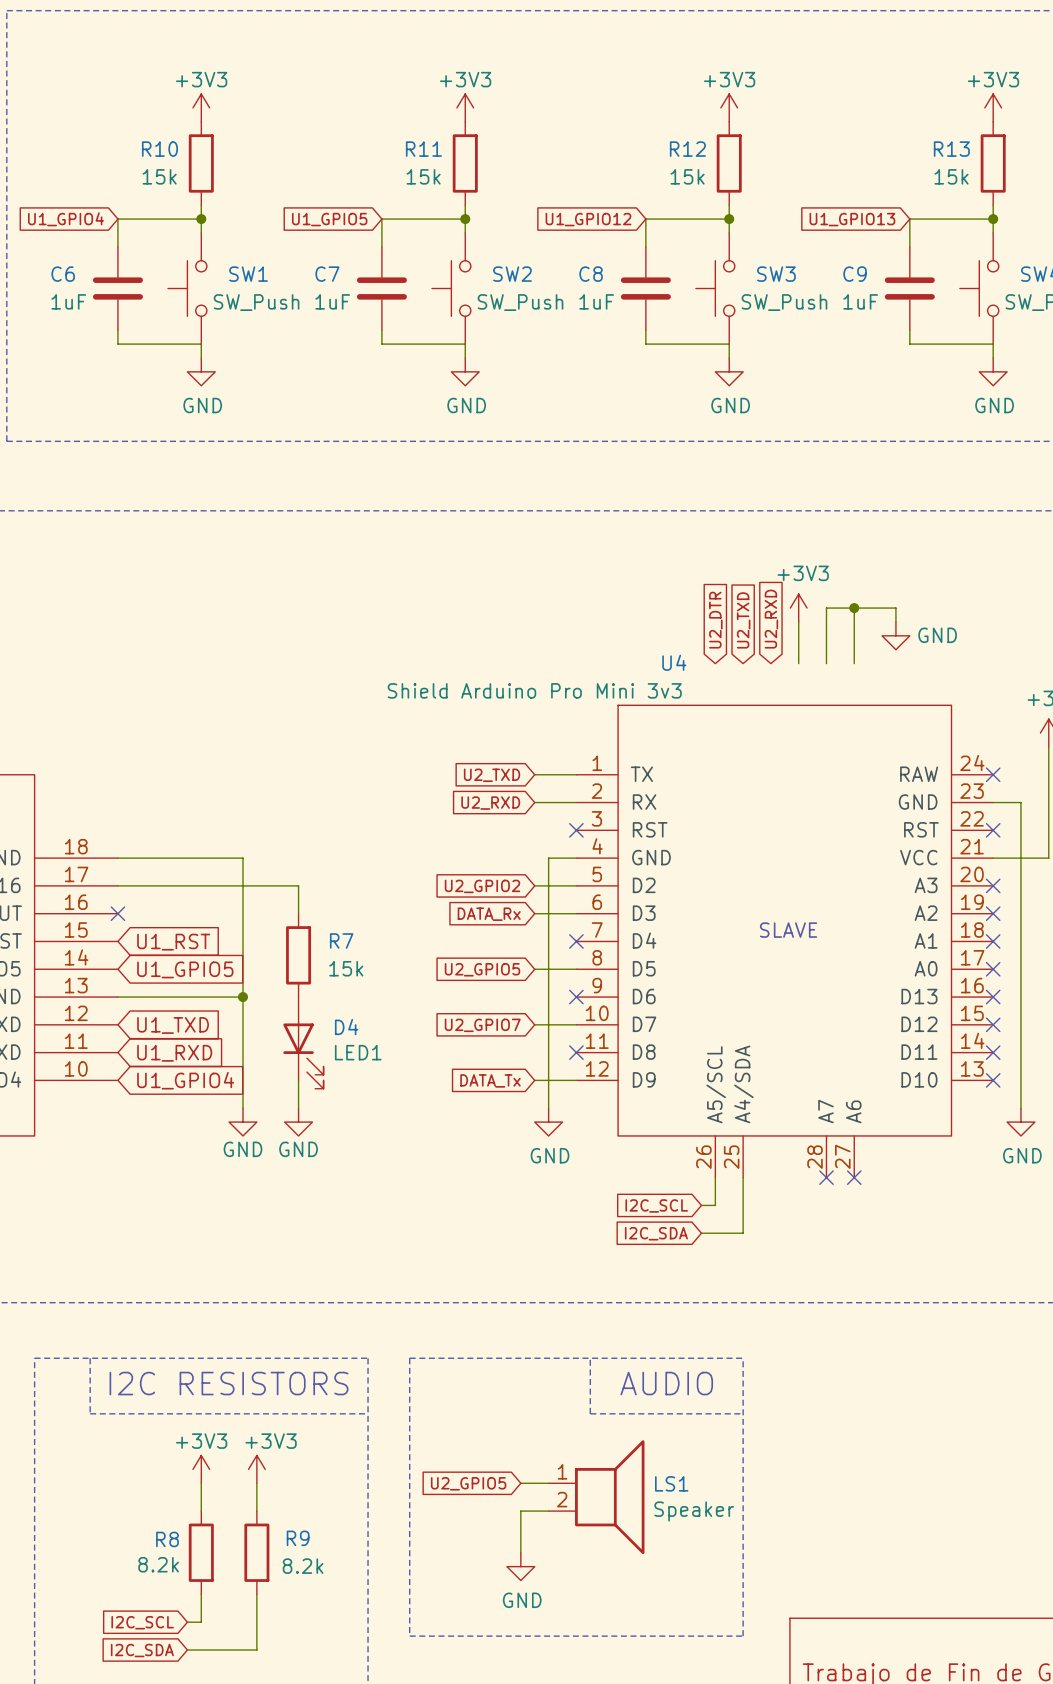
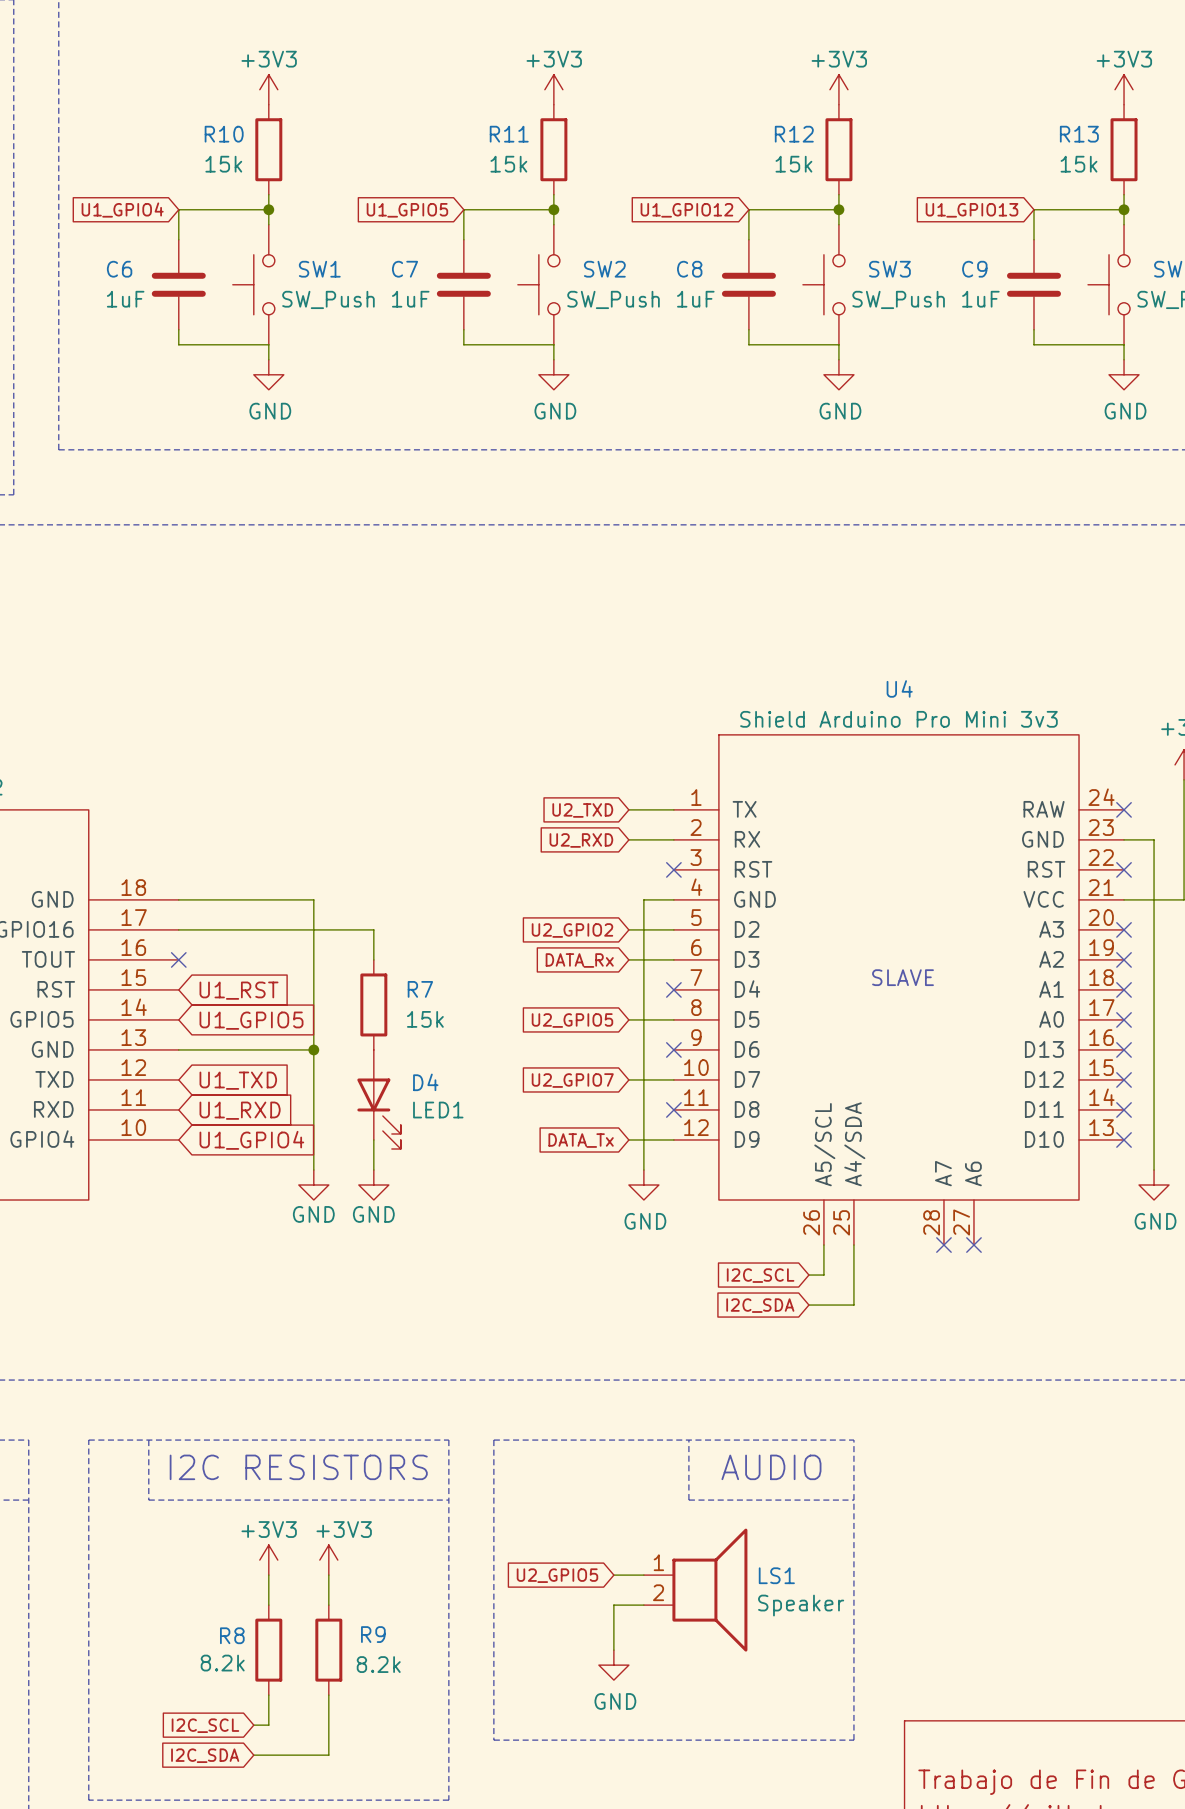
power symbol: +3V3 (798, 608) -> none
wire: (854, 608) (854, 663) -> none
junction: (854, 608) -> none
global label: U2_RXD (771, 619) -> none
global label: U2_DTR (715, 620) -> none
global label: U2_TXD (743, 620) -> none
wire: (798, 621) (798, 663) -> none
wire: (895, 621) (895, 608) (826, 608) (826, 663) -> none
power symbol: GND (895, 635) -> none
U4 name position: U4 (674, 662) -> U4 (899, 688)
U4 value position: Shield Arduino Pro Mini 3v3 (534, 690) -> Shield Arduino Pro Mini 3v3 (898, 719)

